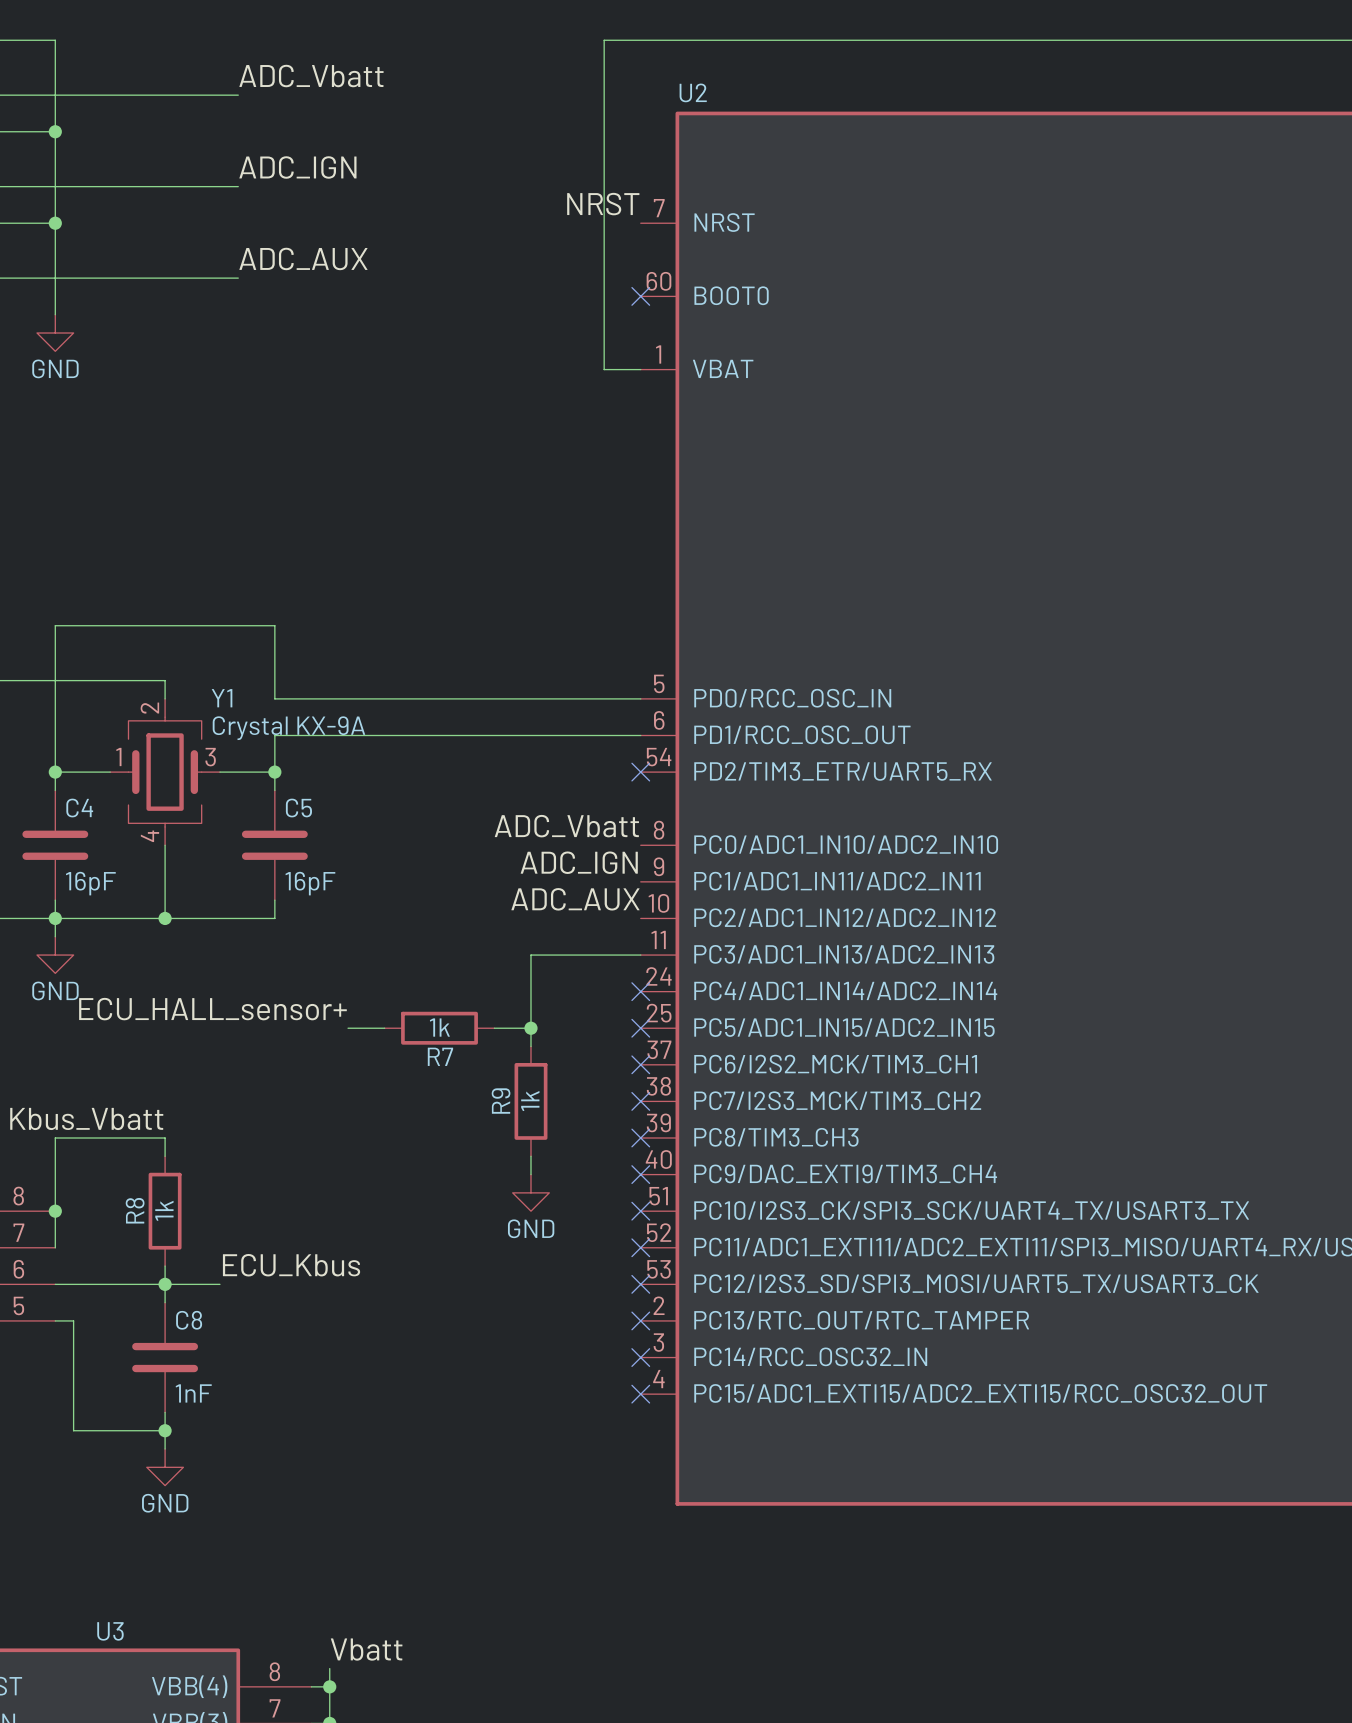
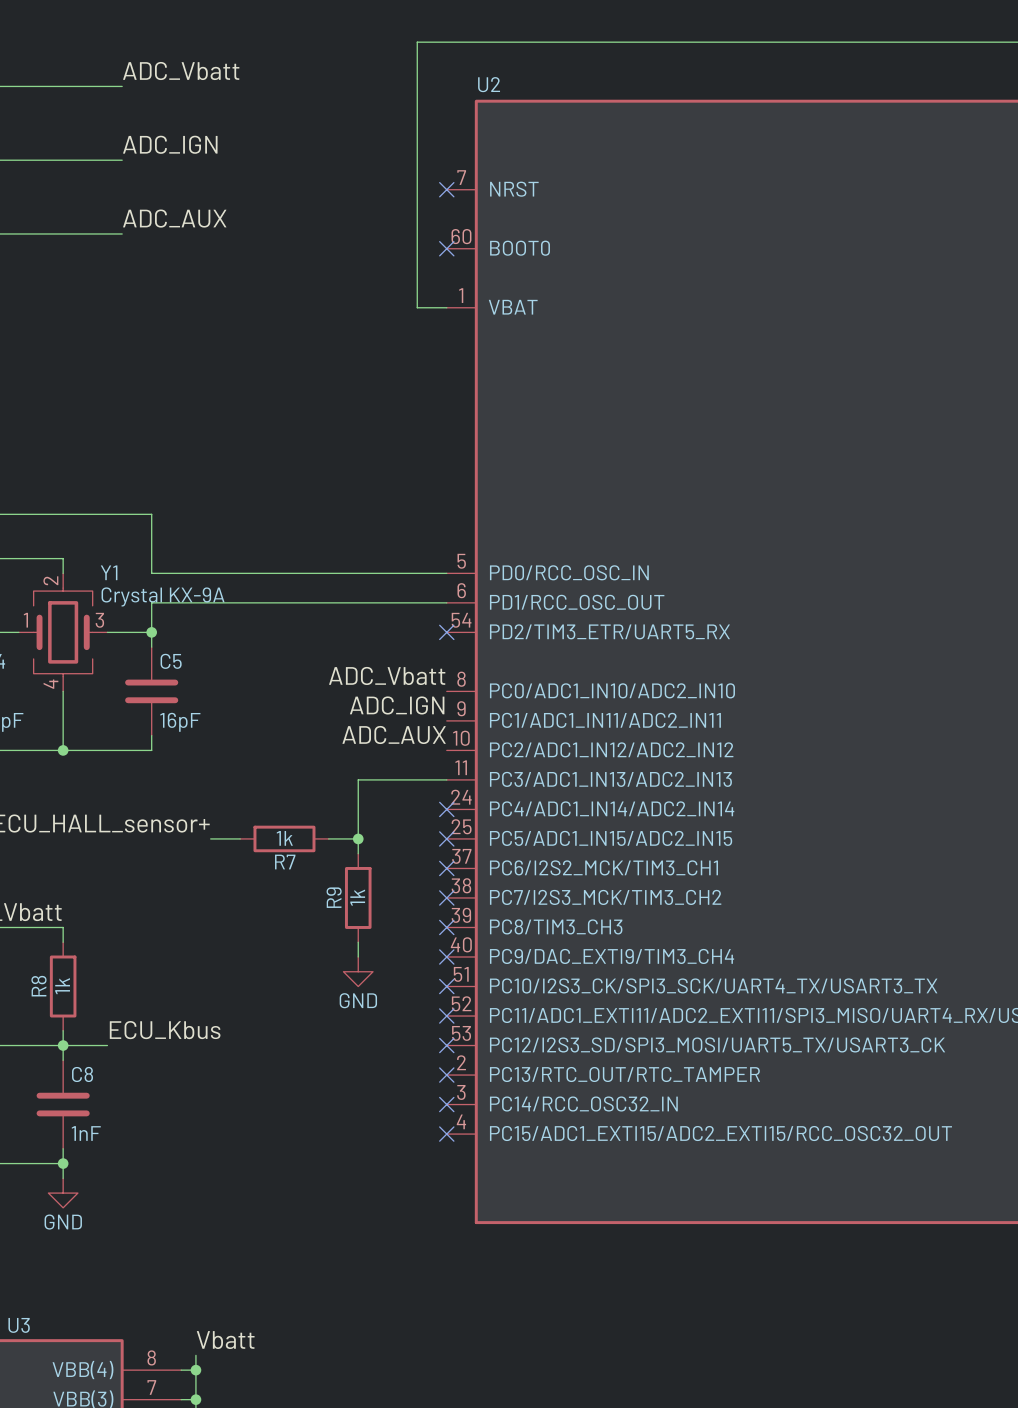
label: NRST (603, 204) -> none
no-connect mark: none -> (446, 189)

